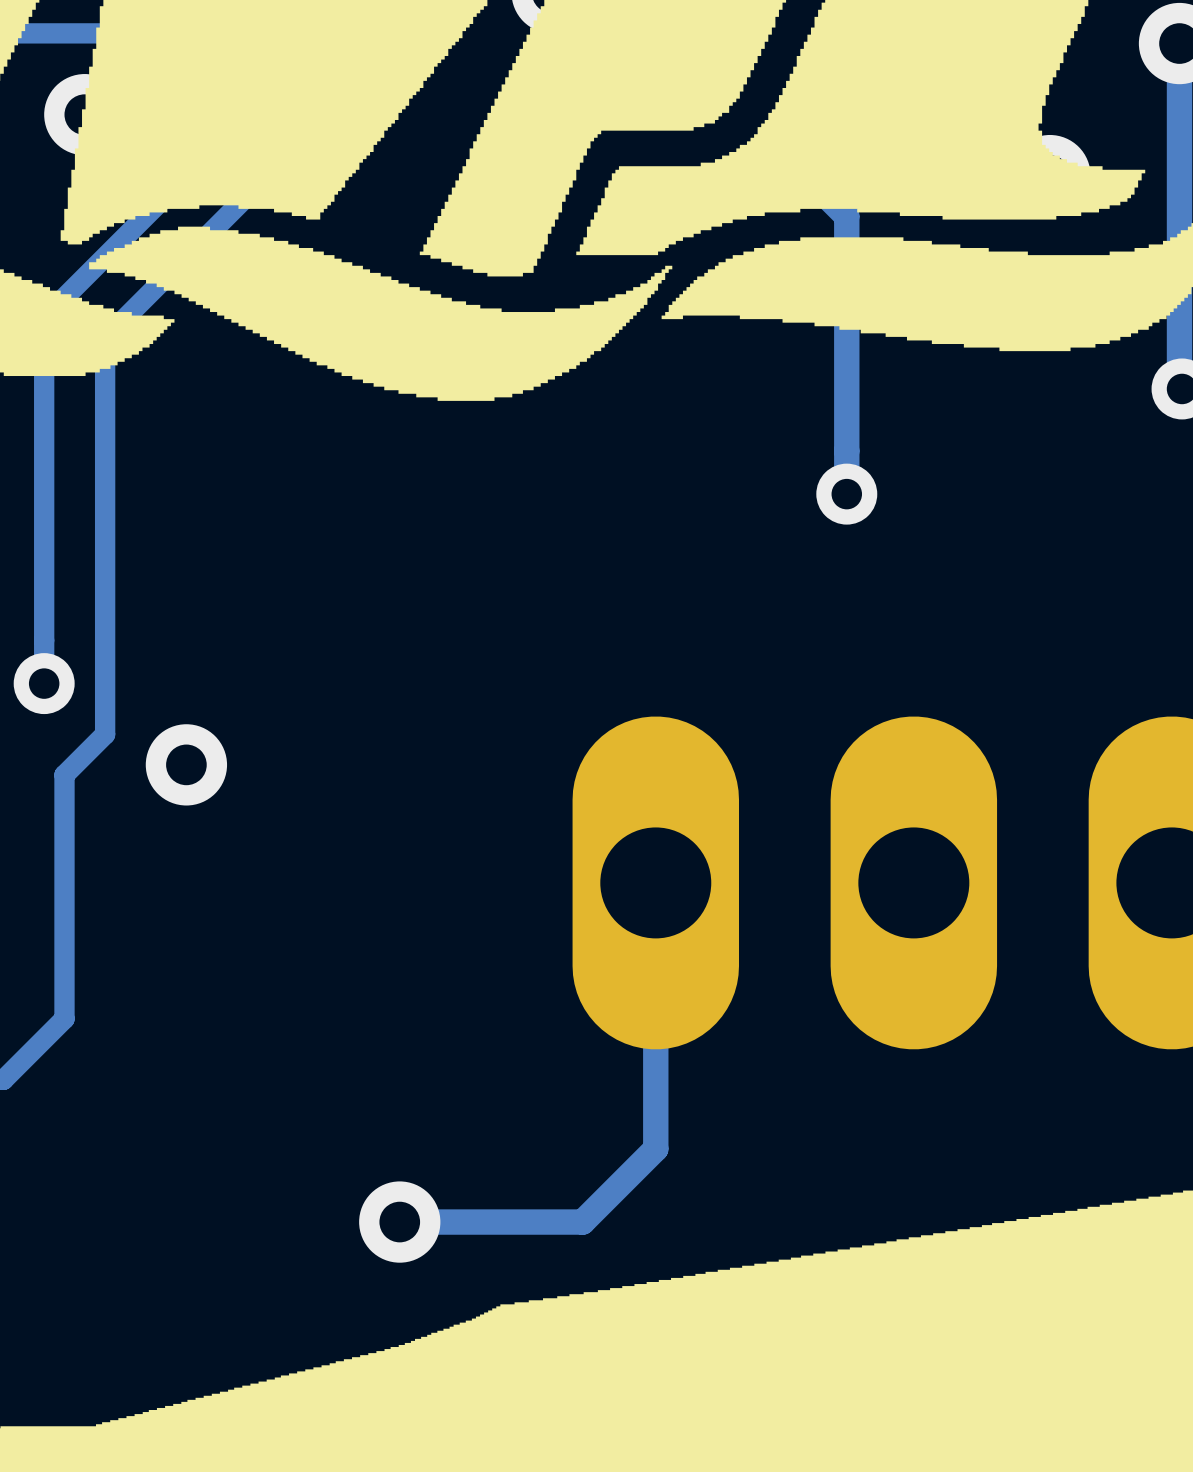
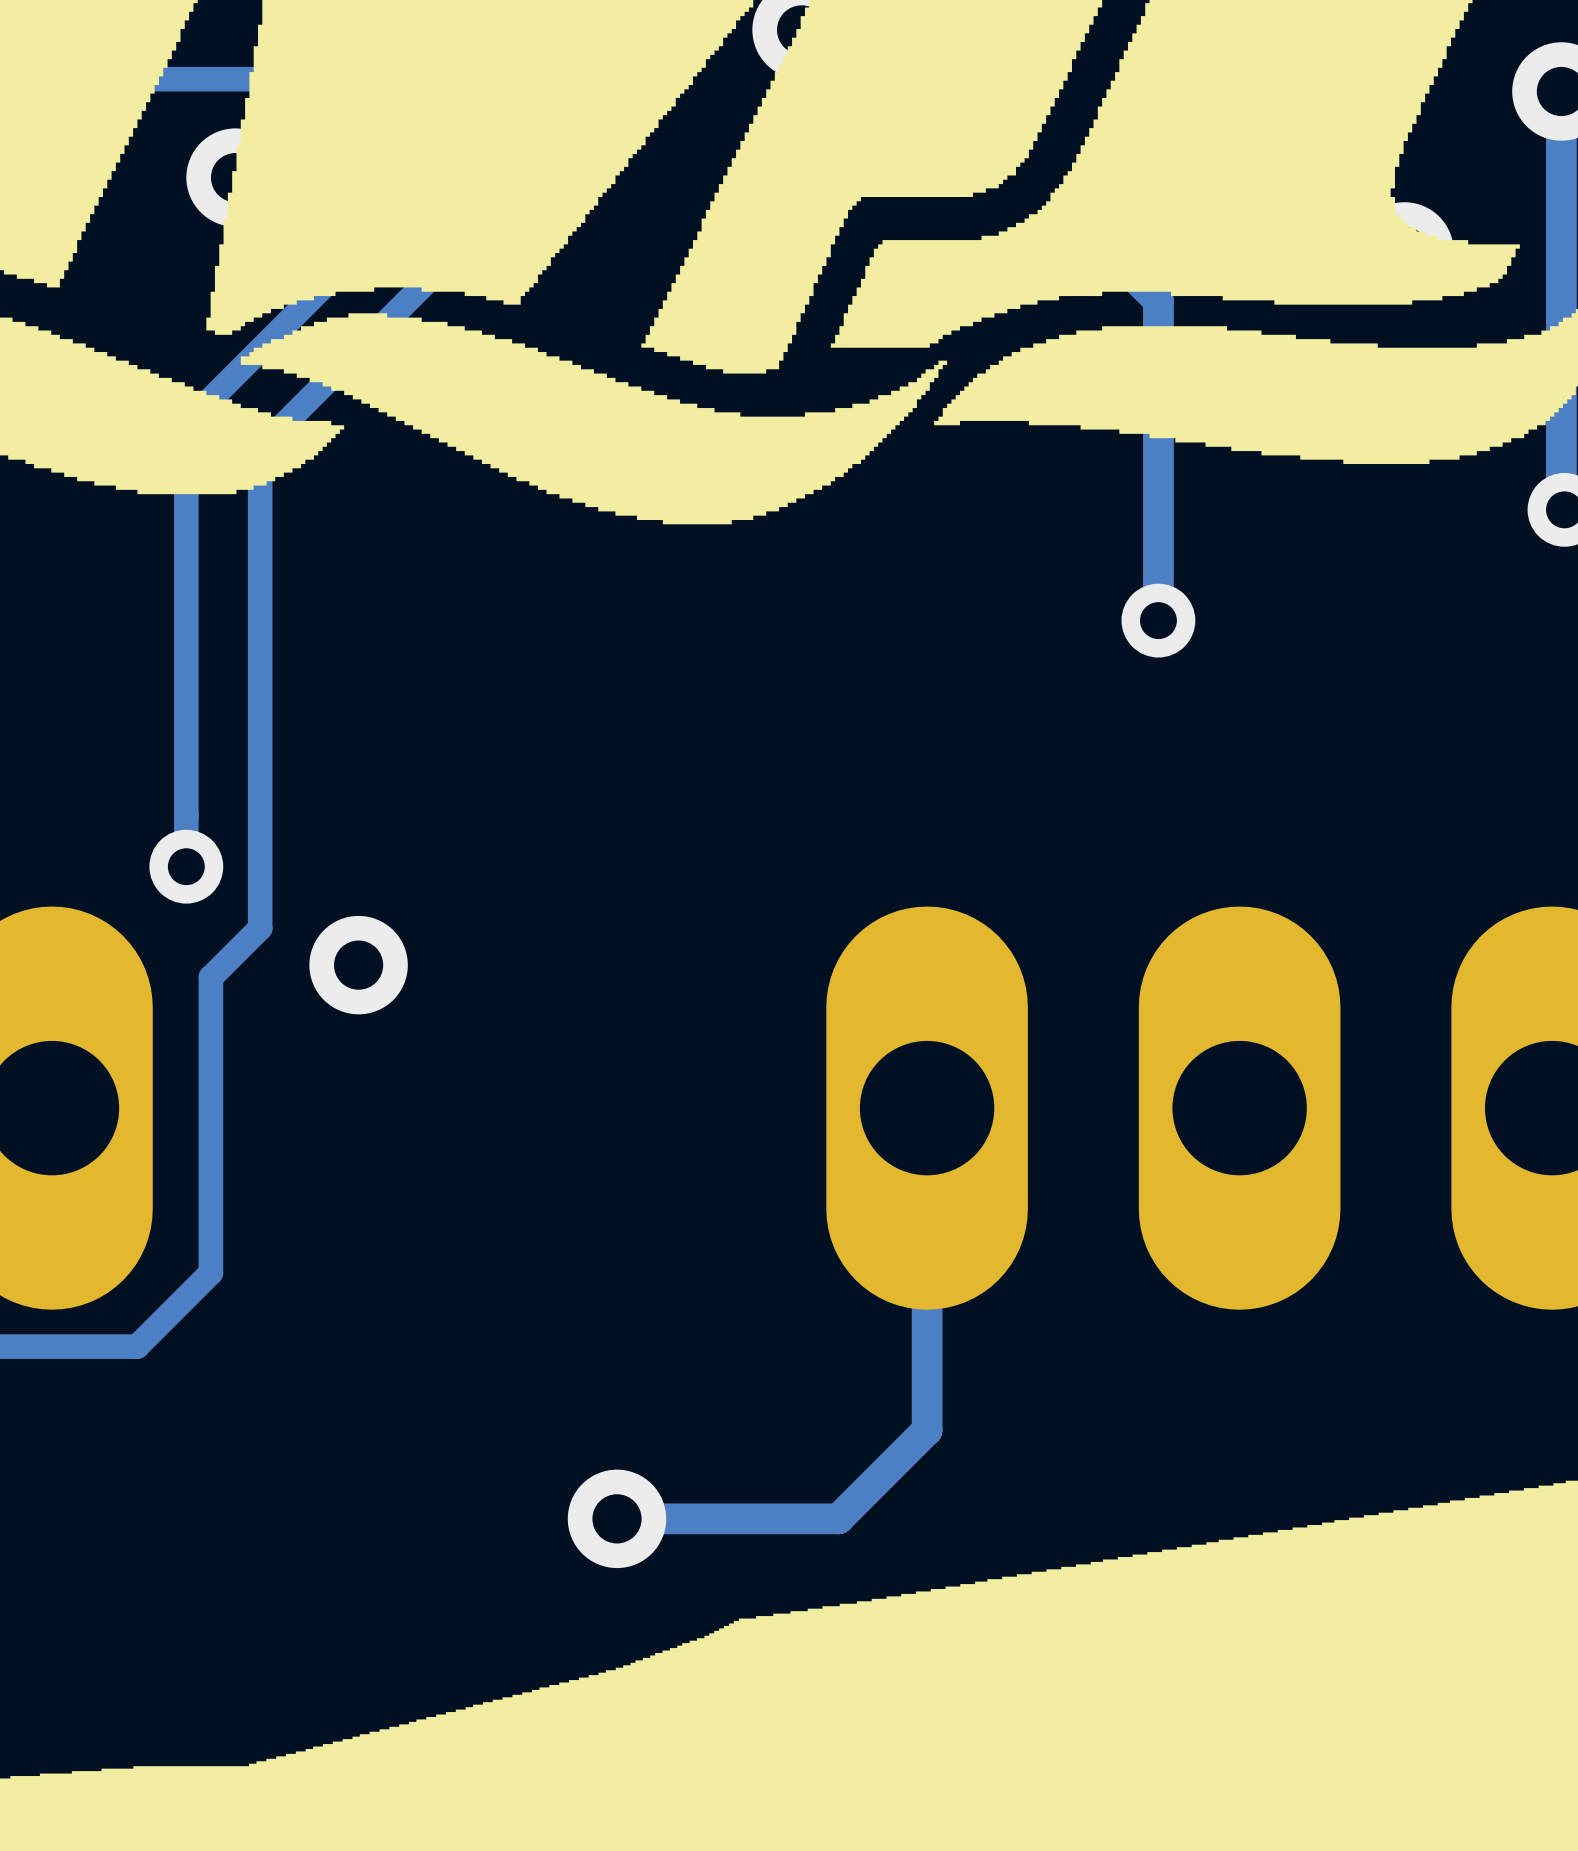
via position: (846, 494) -> (1158, 620)

